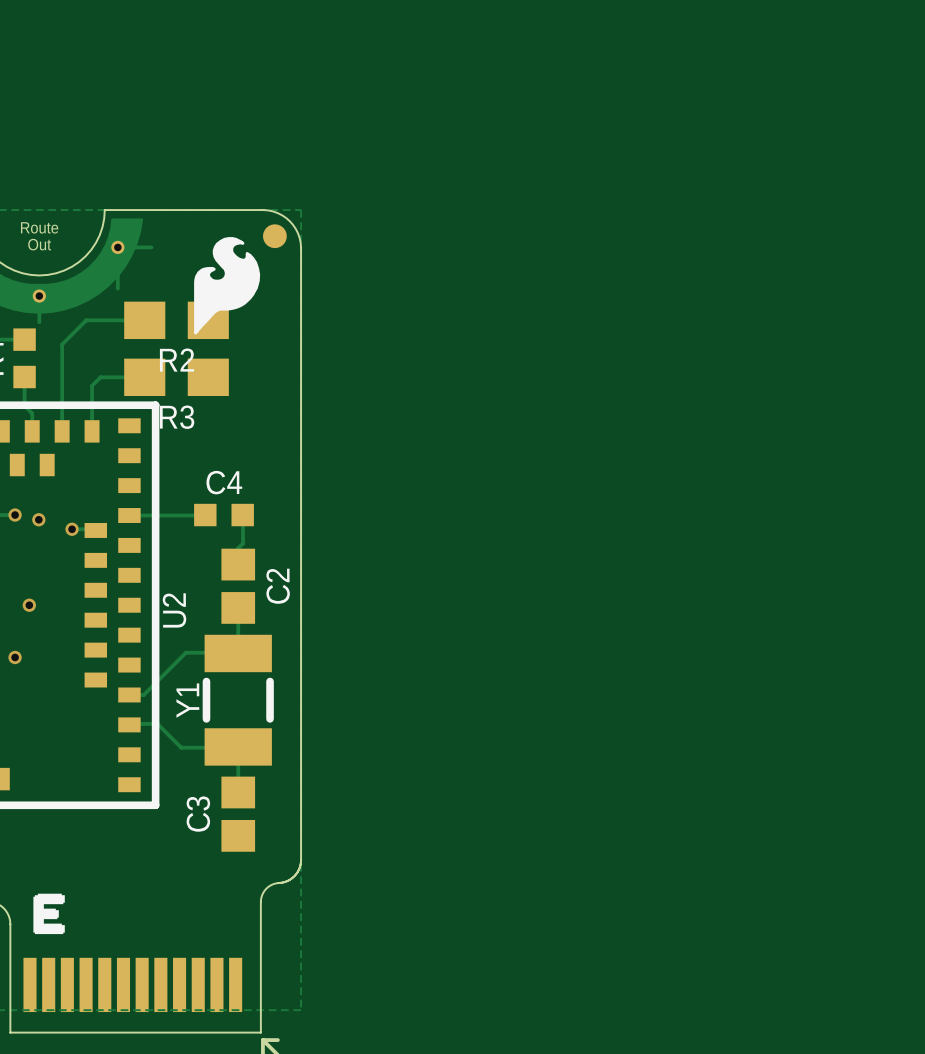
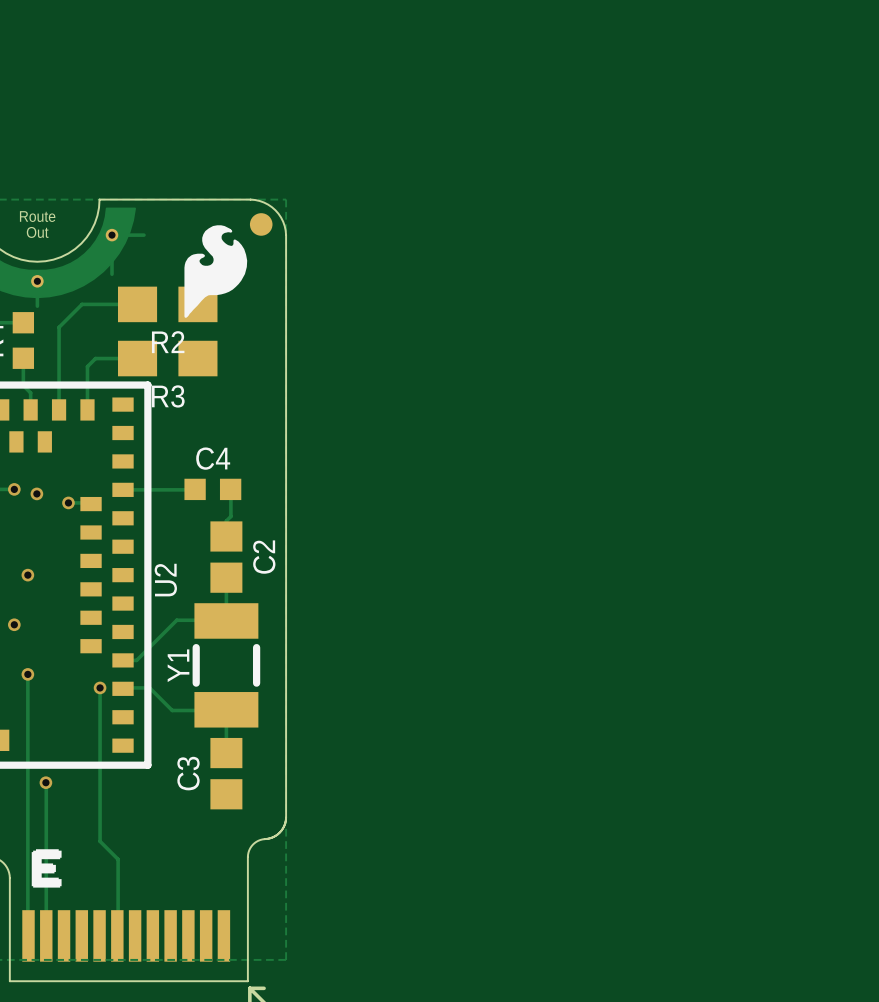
track: none -> (27, 674) (28, 935)
via: none -> (27, 674)
track: none -> (100, 687) (100, 841) (118, 859) (117, 935)
via: none -> (100, 687)
via: none -> (45, 782)
track: none -> (46, 783) (46, 935)

